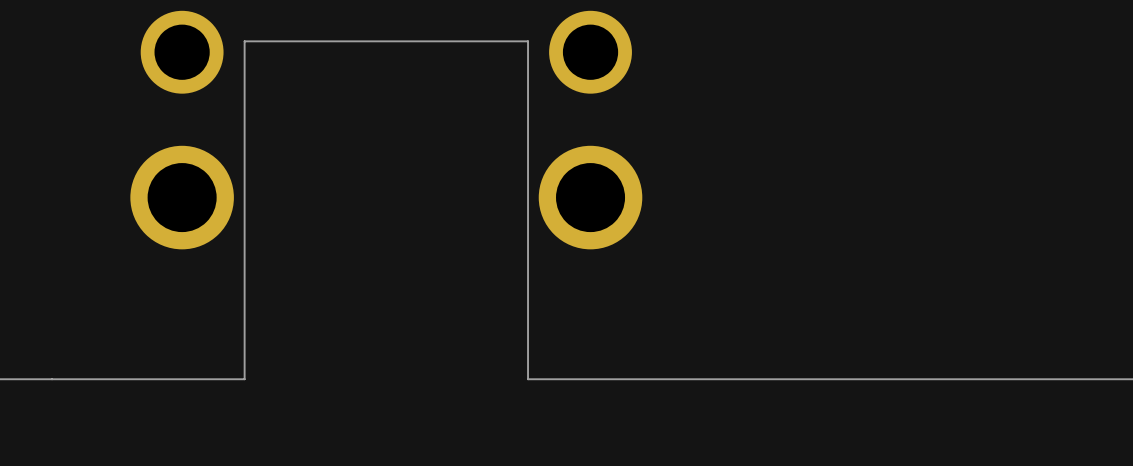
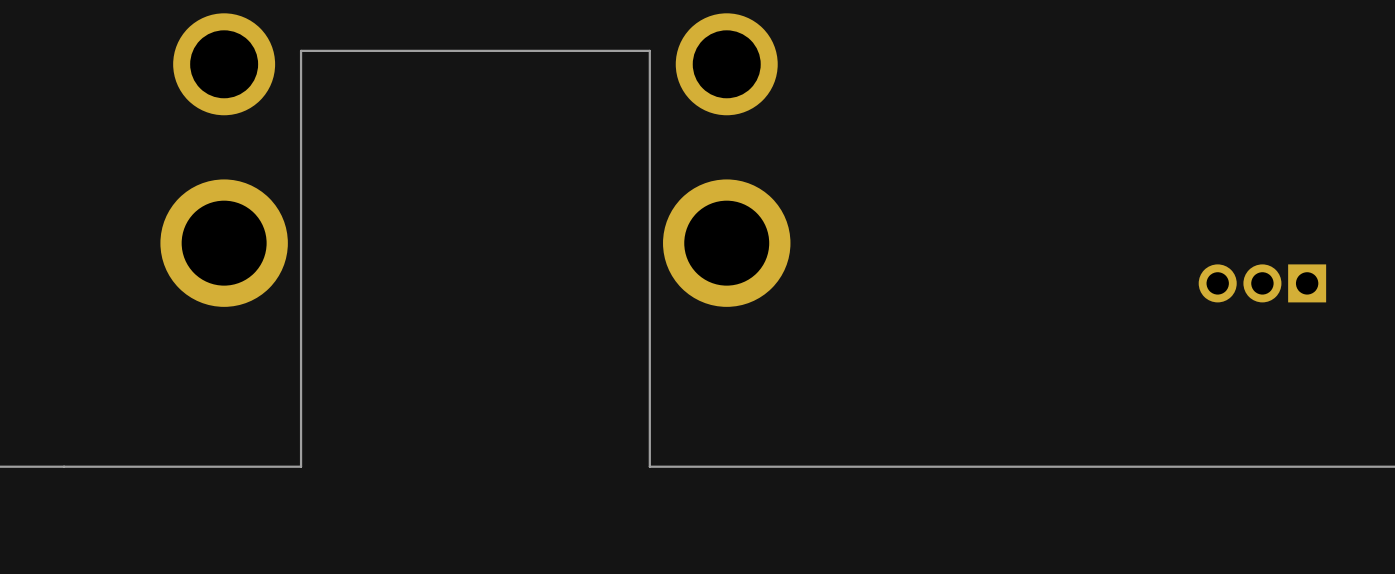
part: none -> (1262, 283)

